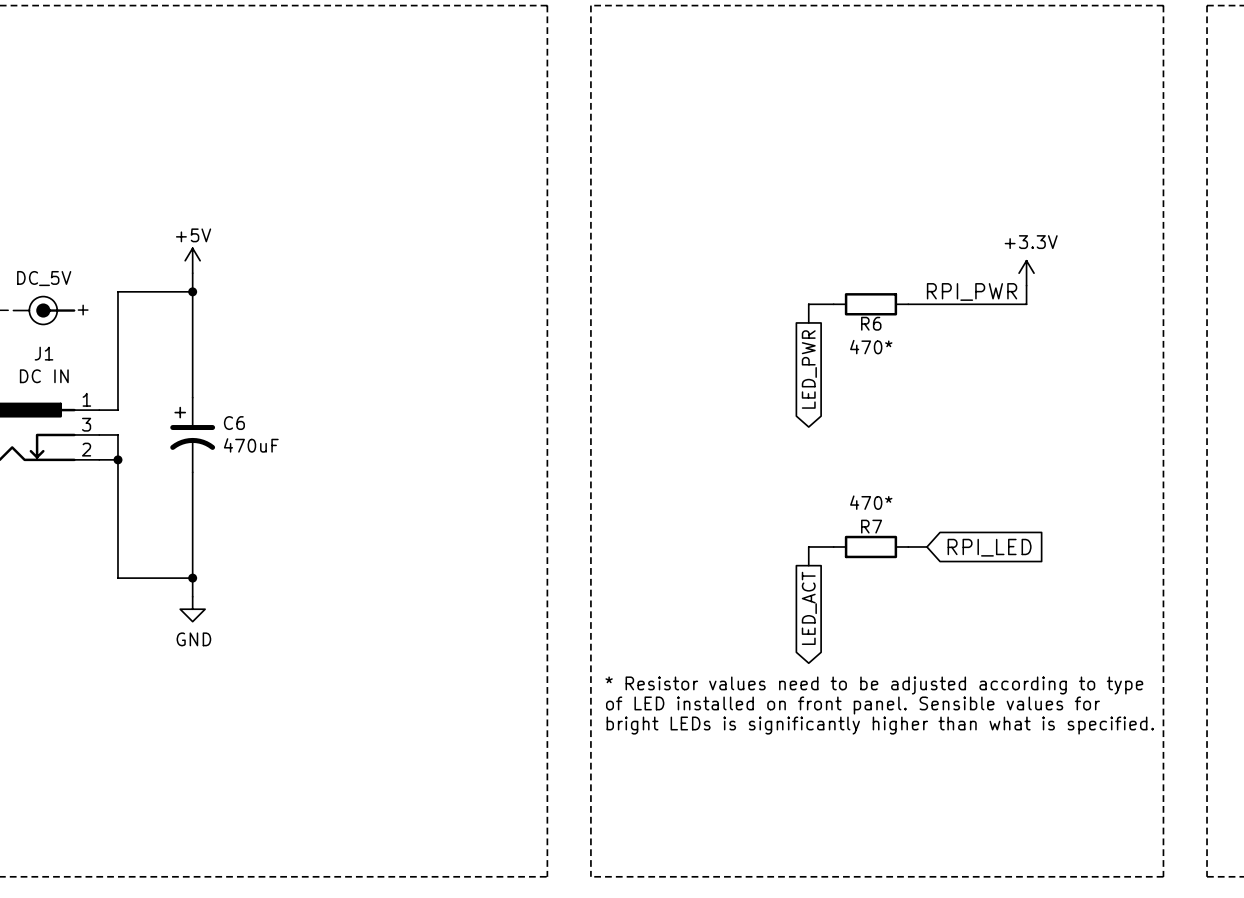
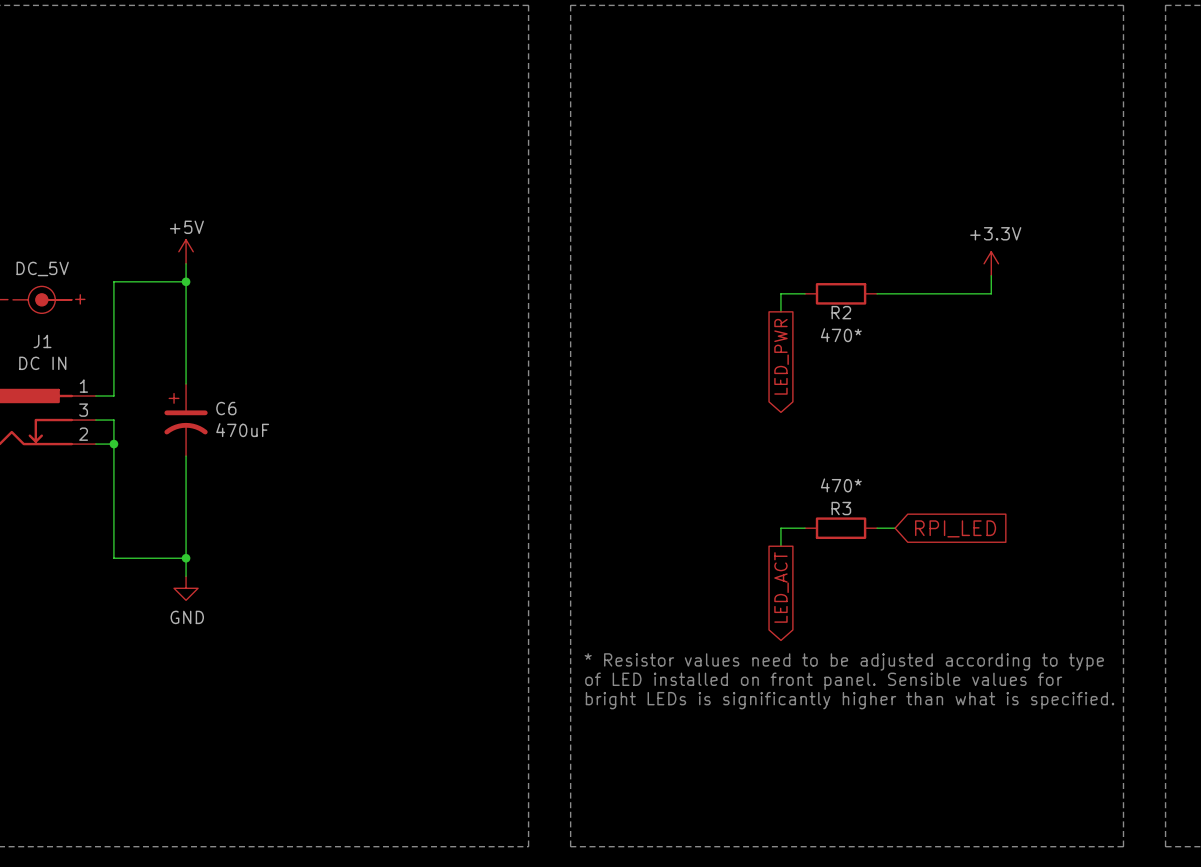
label: RPI_PWR (972, 291) -> none
R6 name: R6 (871, 323) -> R2 (841, 312)
R7 name: R7 (871, 526) -> R3 (841, 508)

